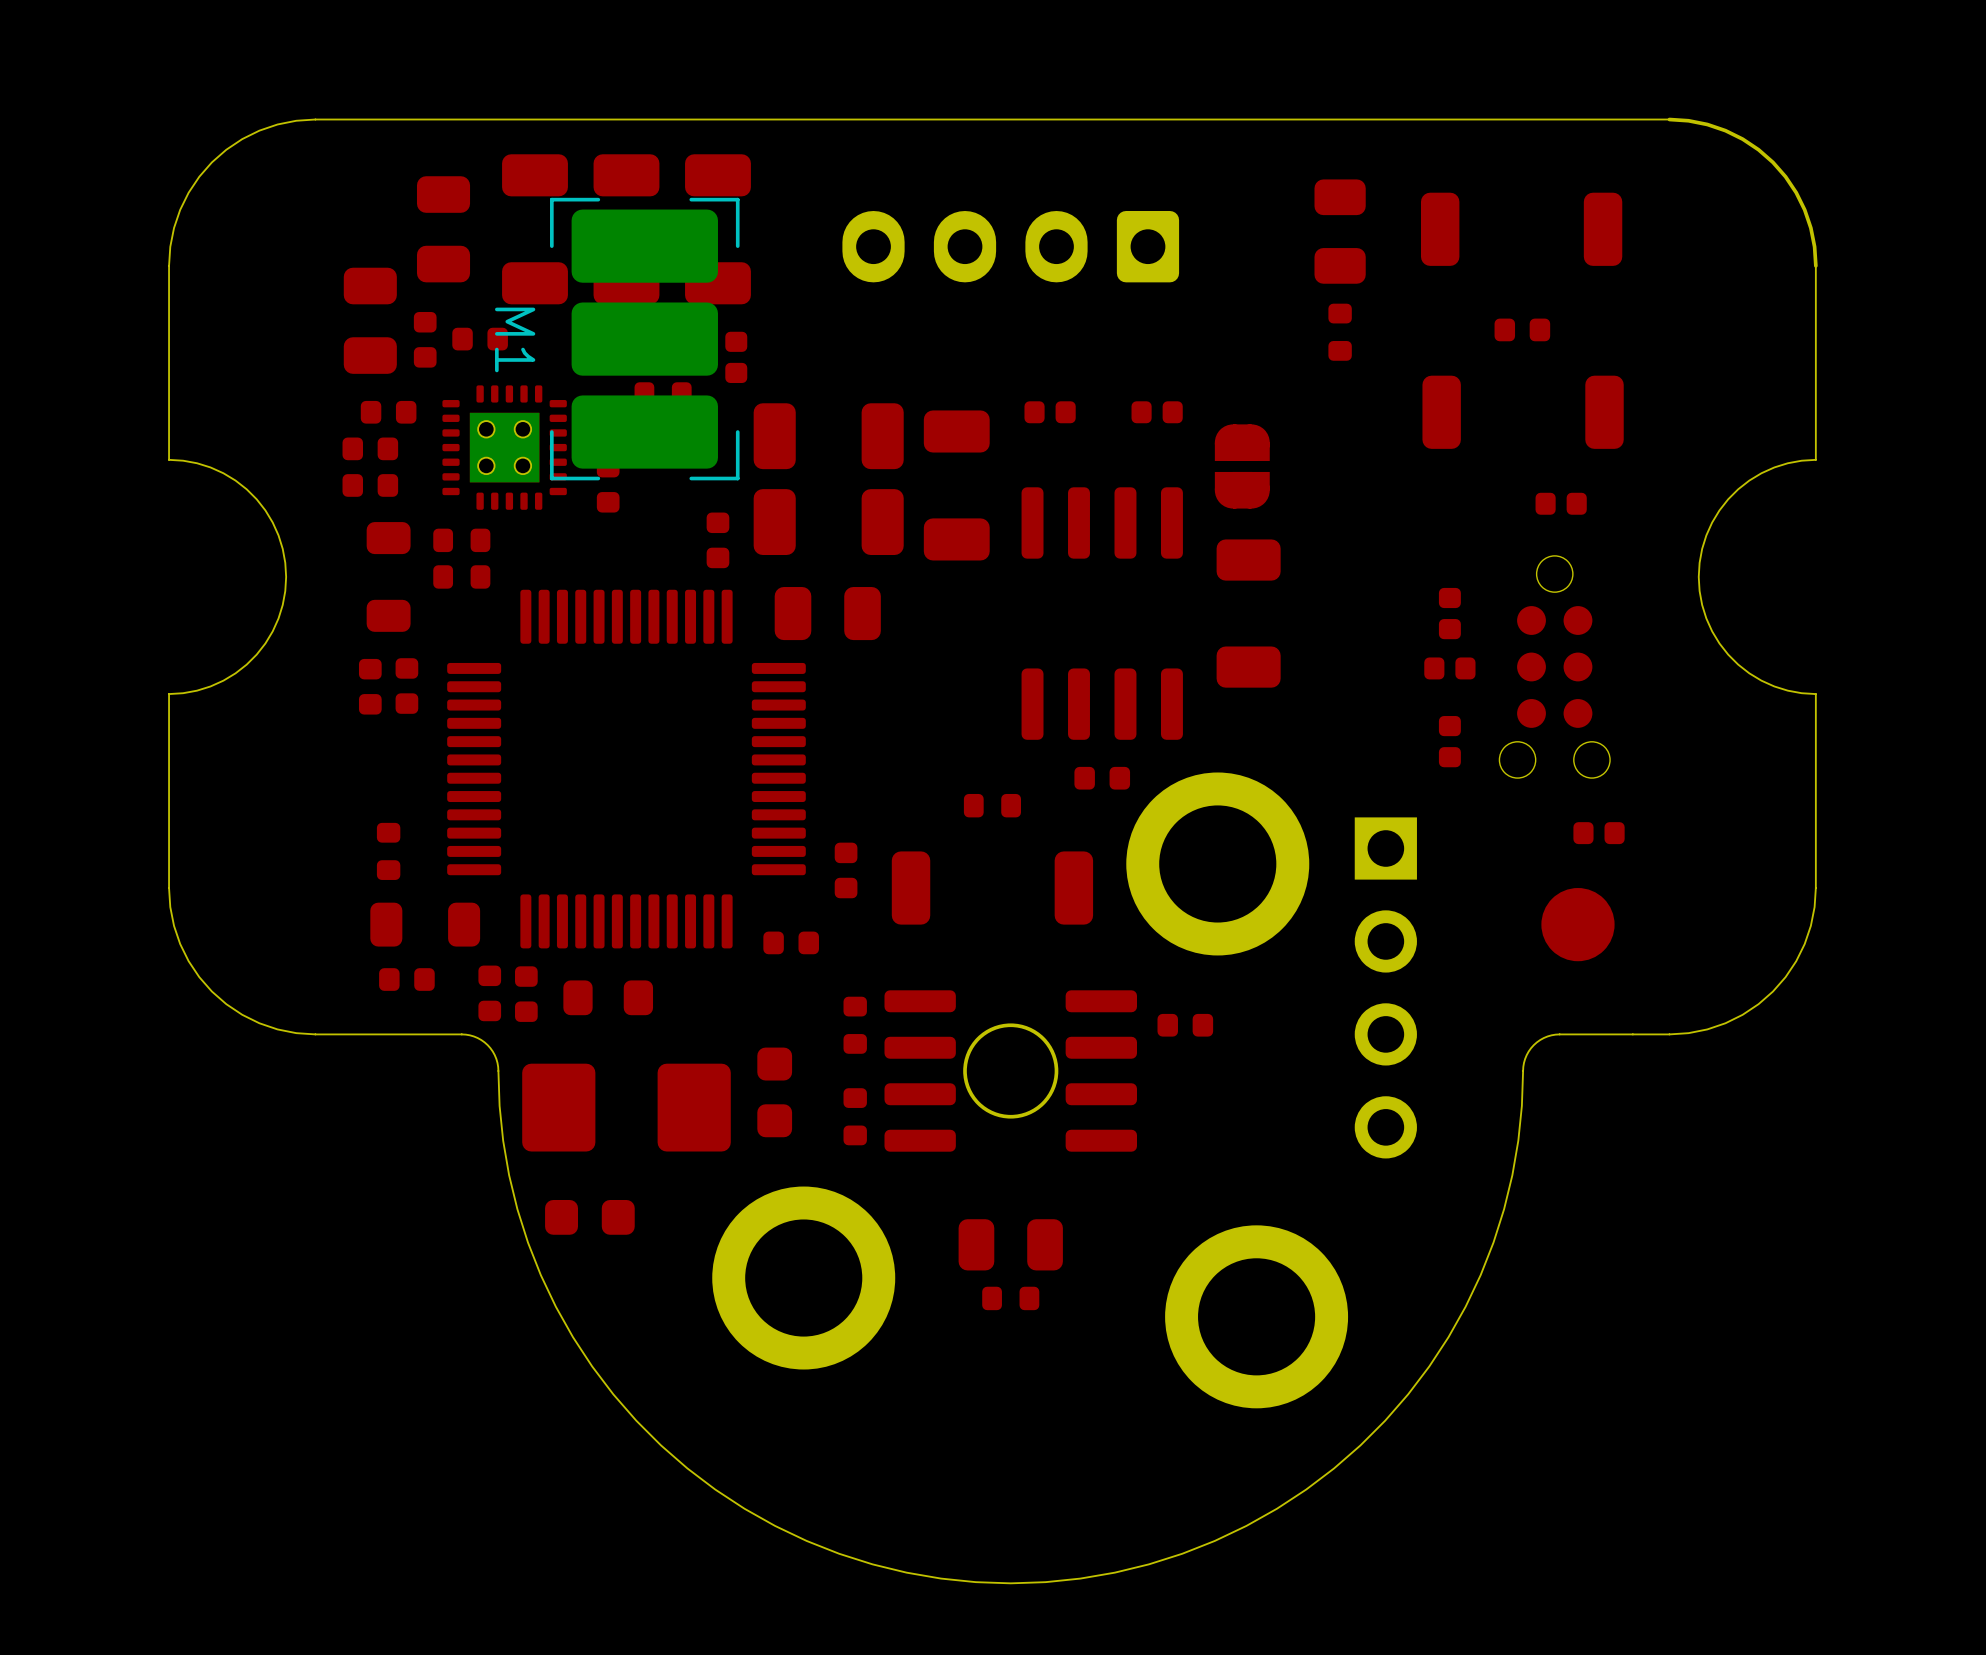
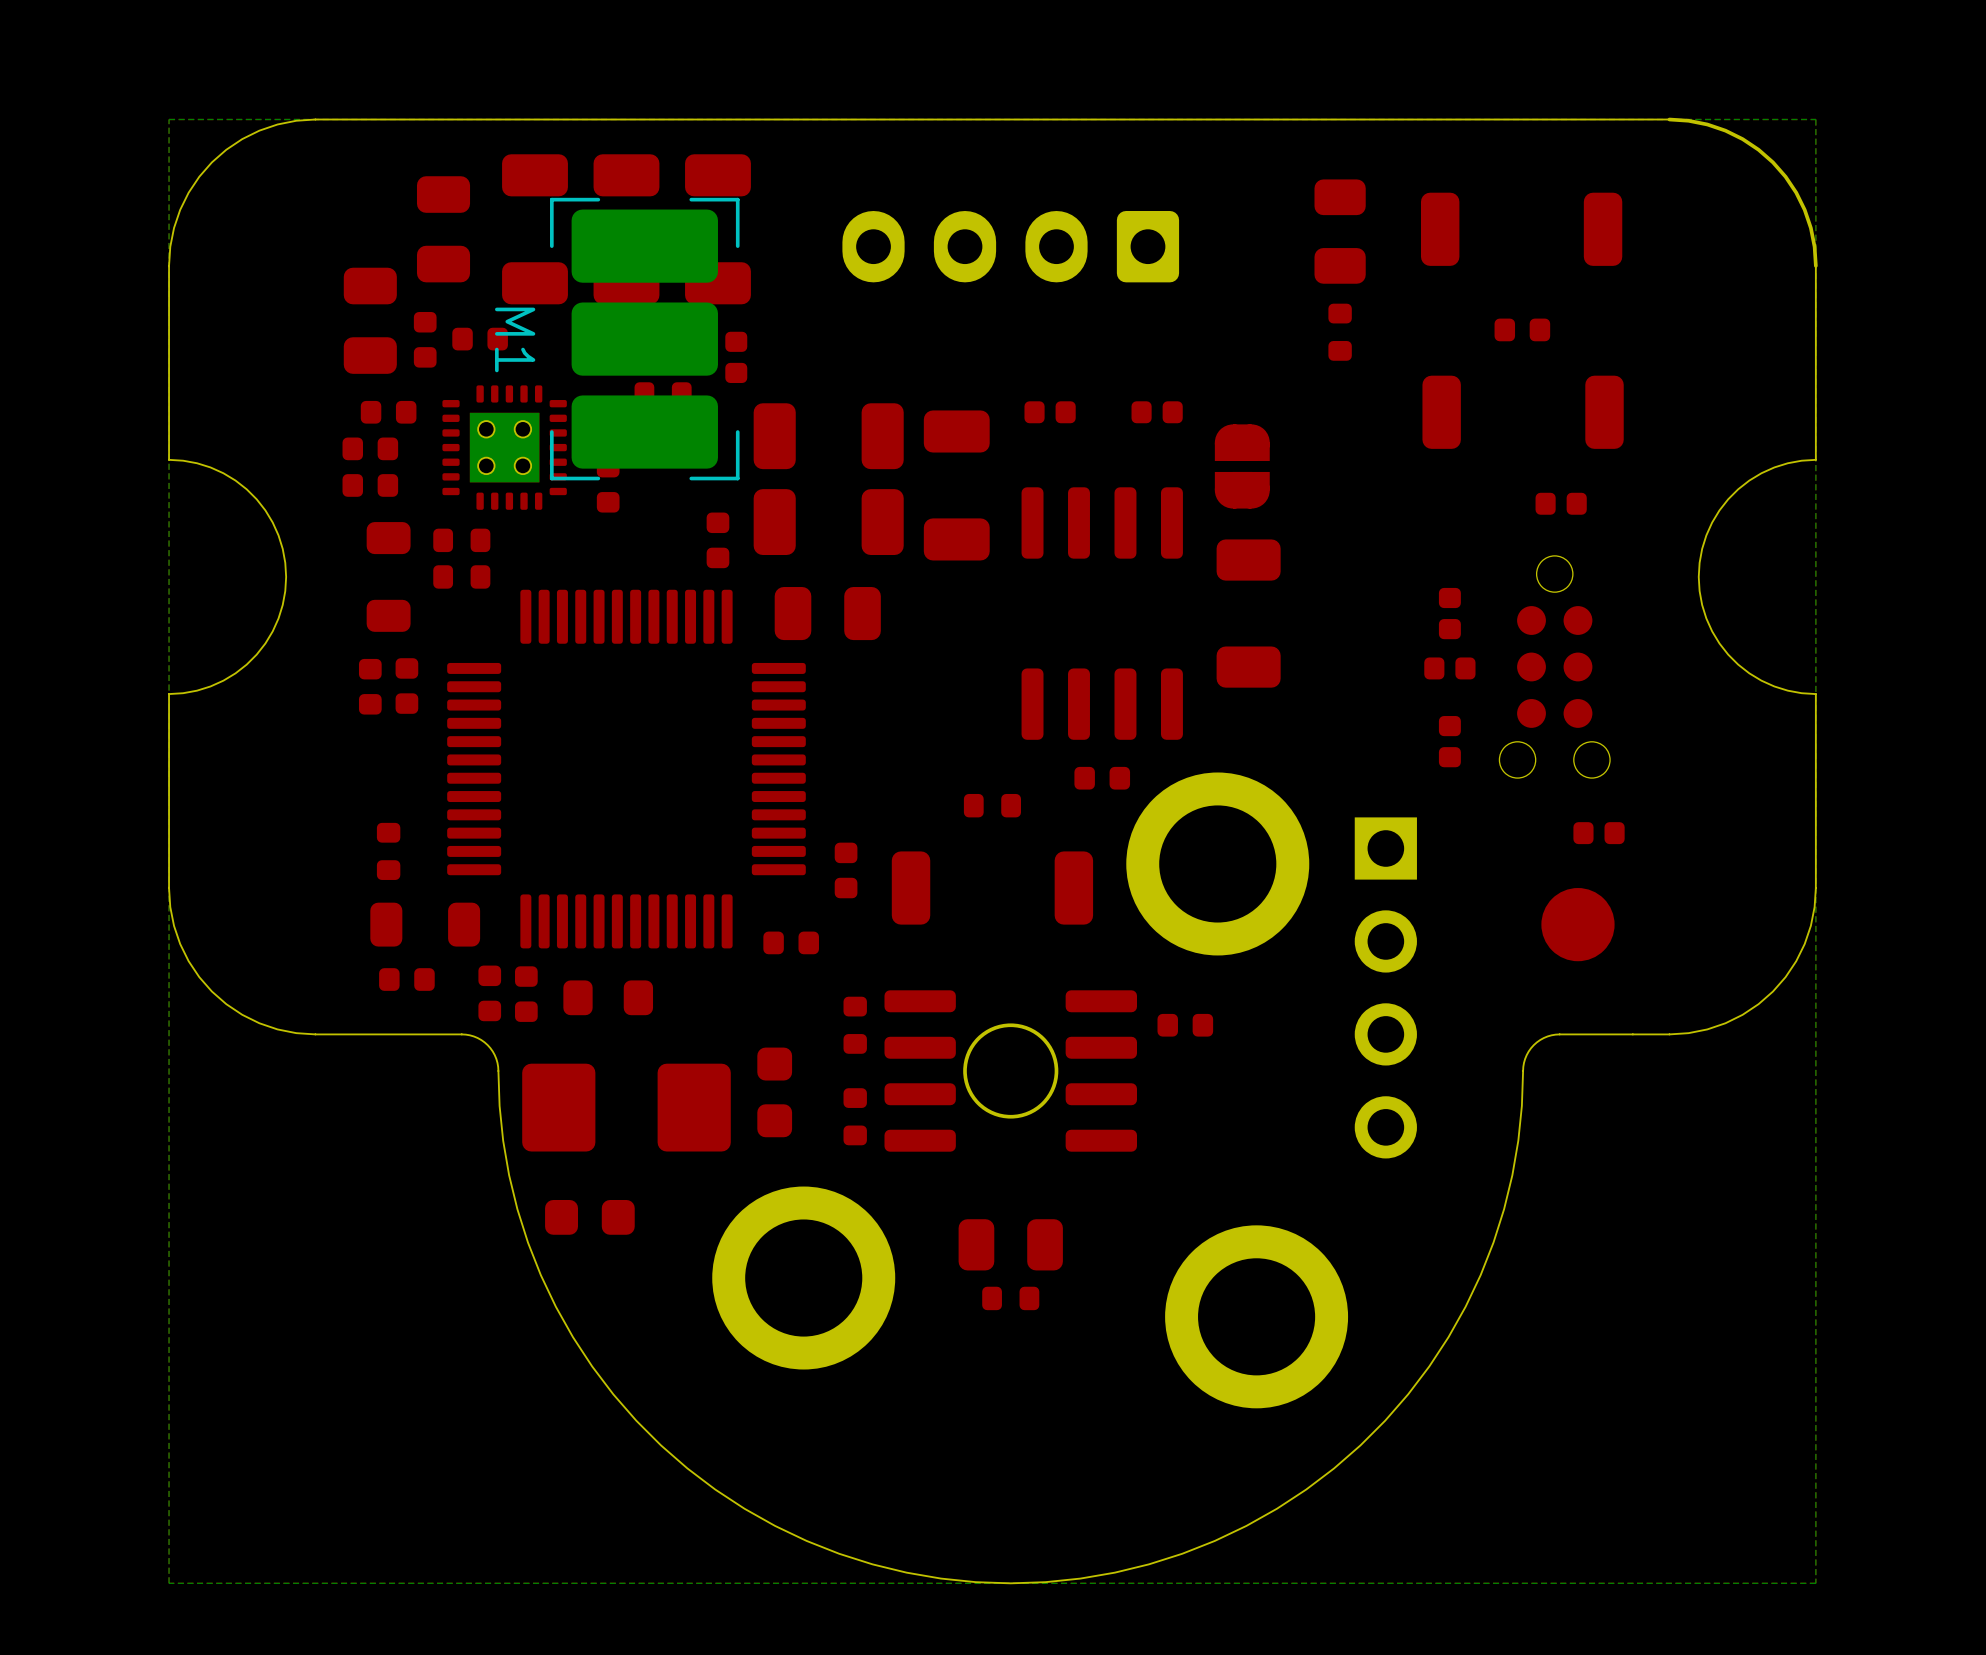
bottom zone outline: none -> (1815, 119) (1815, 1583) (169, 1583) (169, 119) (1815, 119)

